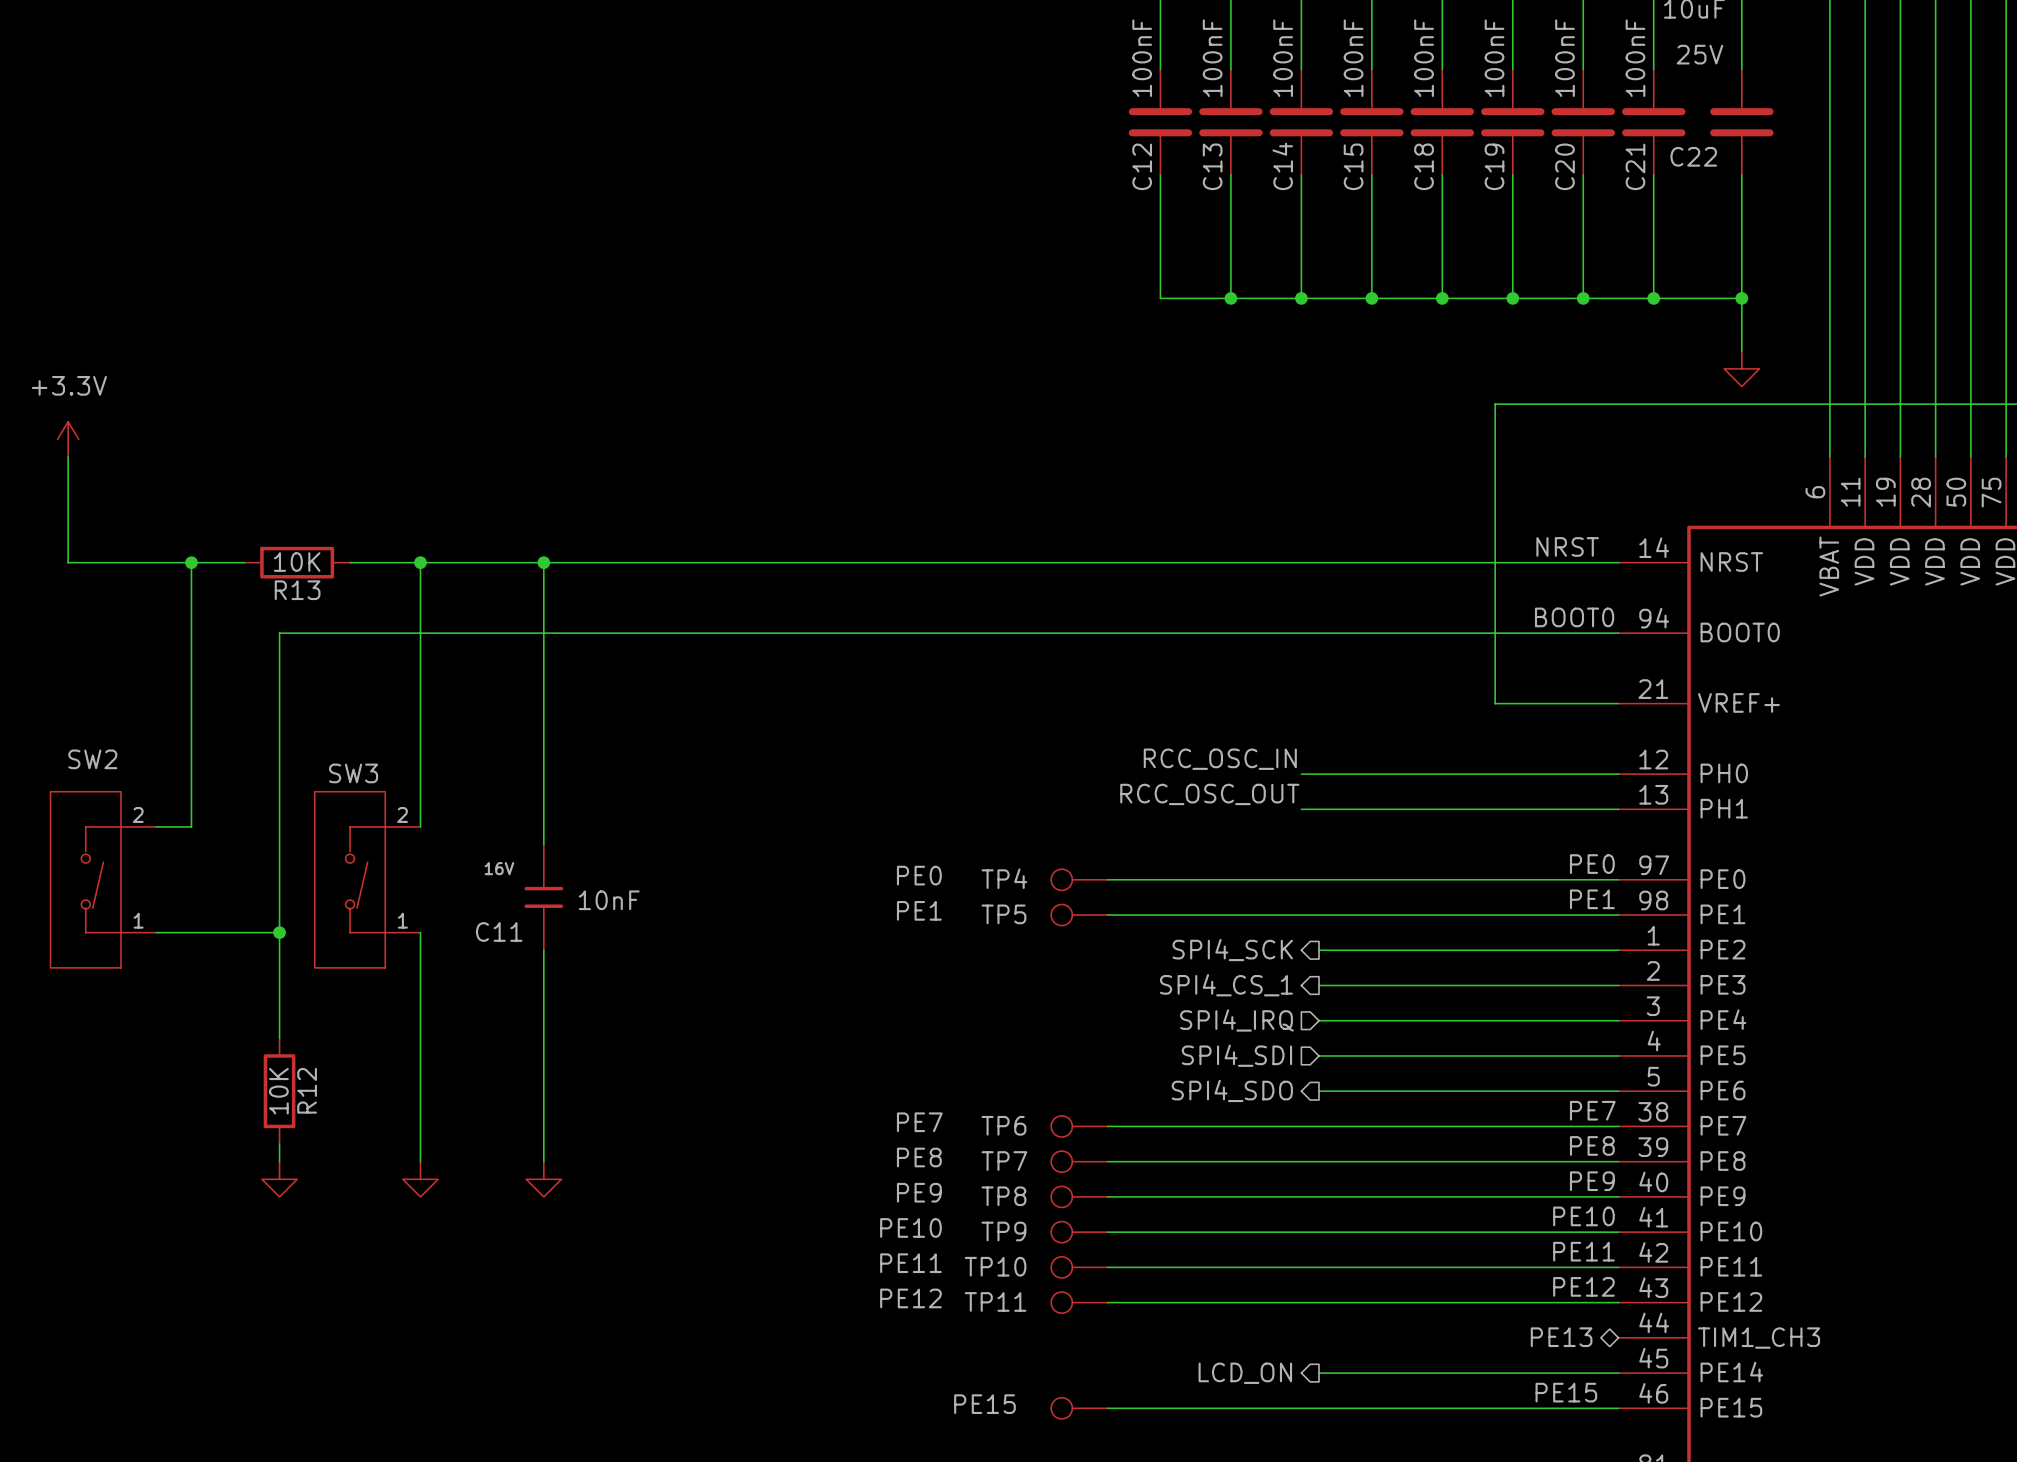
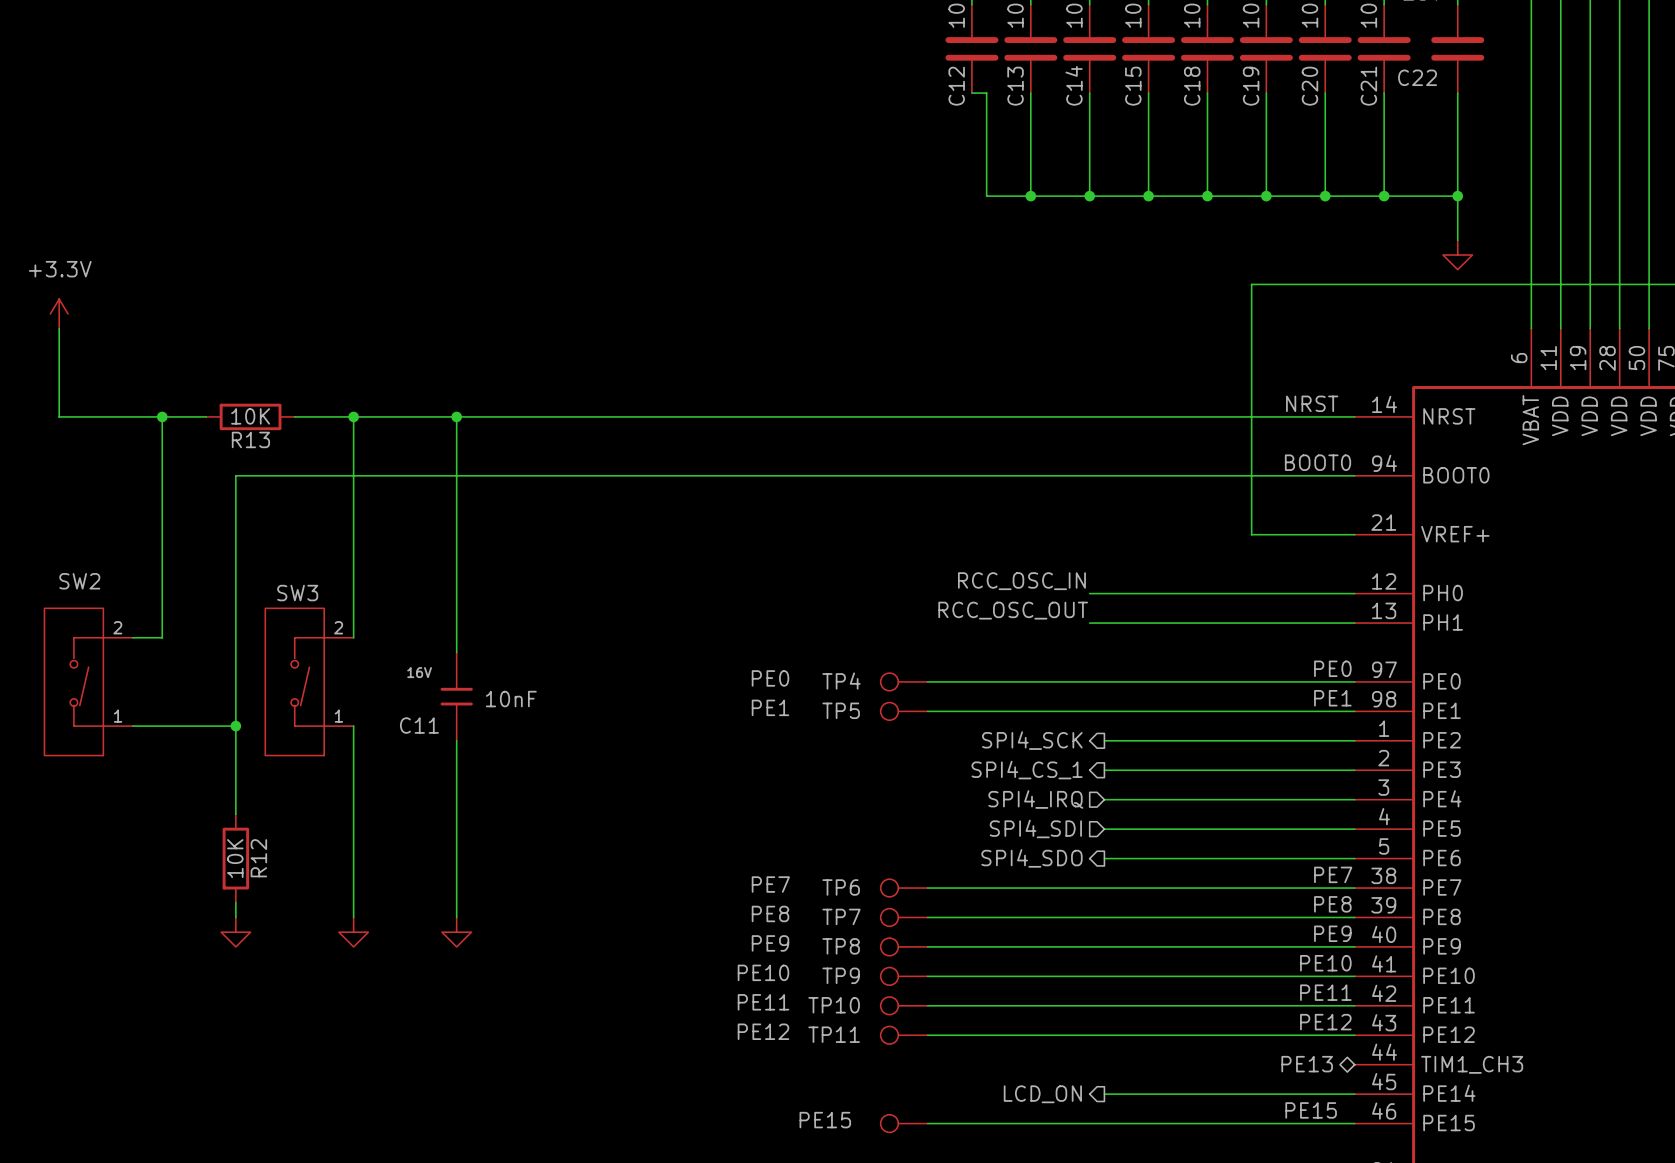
wire: (1160, 175) (1160, 298) (1178, 298) -> (971, 93) (986, 93) (986, 196)

